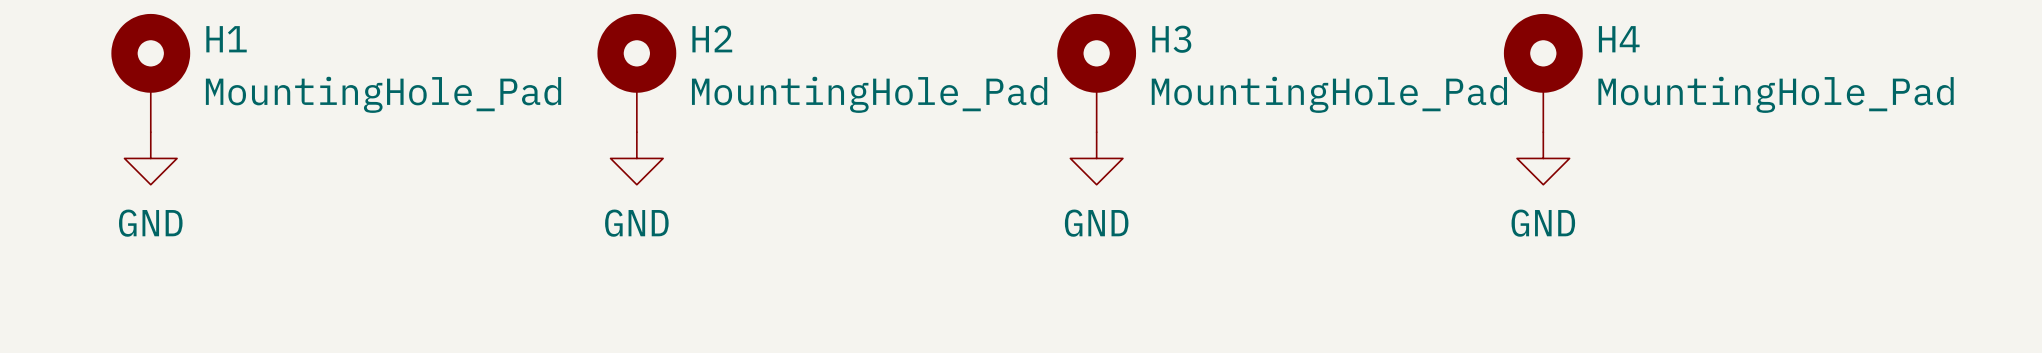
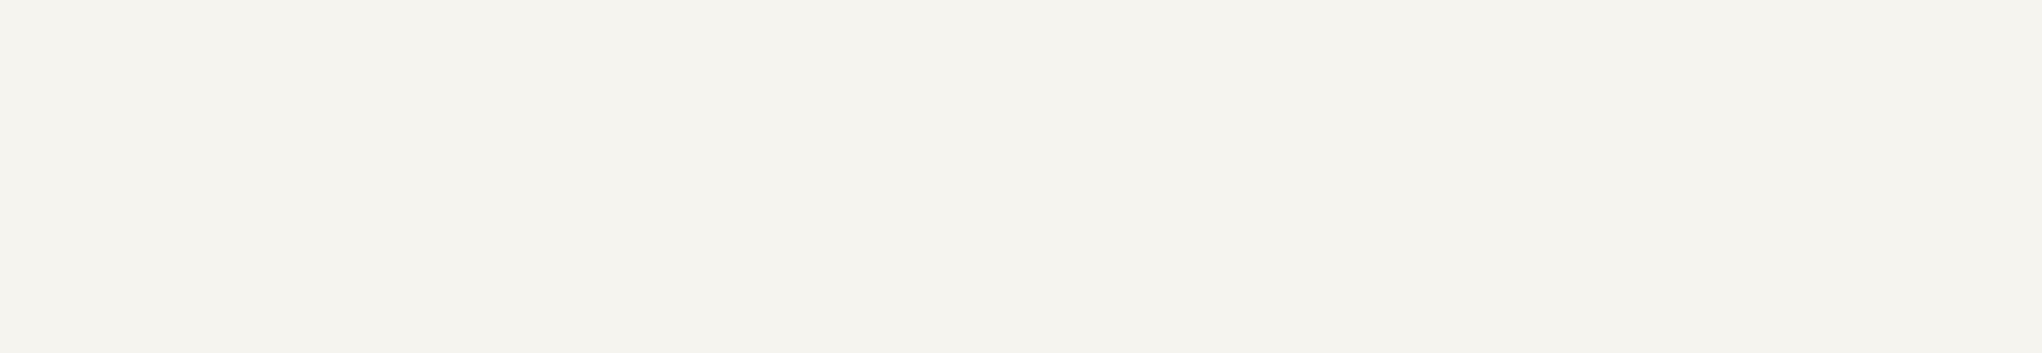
H1: MountingHole_Pad (150, 73) -> none
H2: MountingHole_Pad (636, 73) -> none
H3: MountingHole_Pad (1096, 73) -> none
H4: MountingHole_Pad (1543, 73) -> none
power symbol: GND (150, 158) -> none
power symbol: GND (636, 158) -> none
power symbol: GND (1096, 158) -> none
power symbol: GND (1543, 158) -> none

